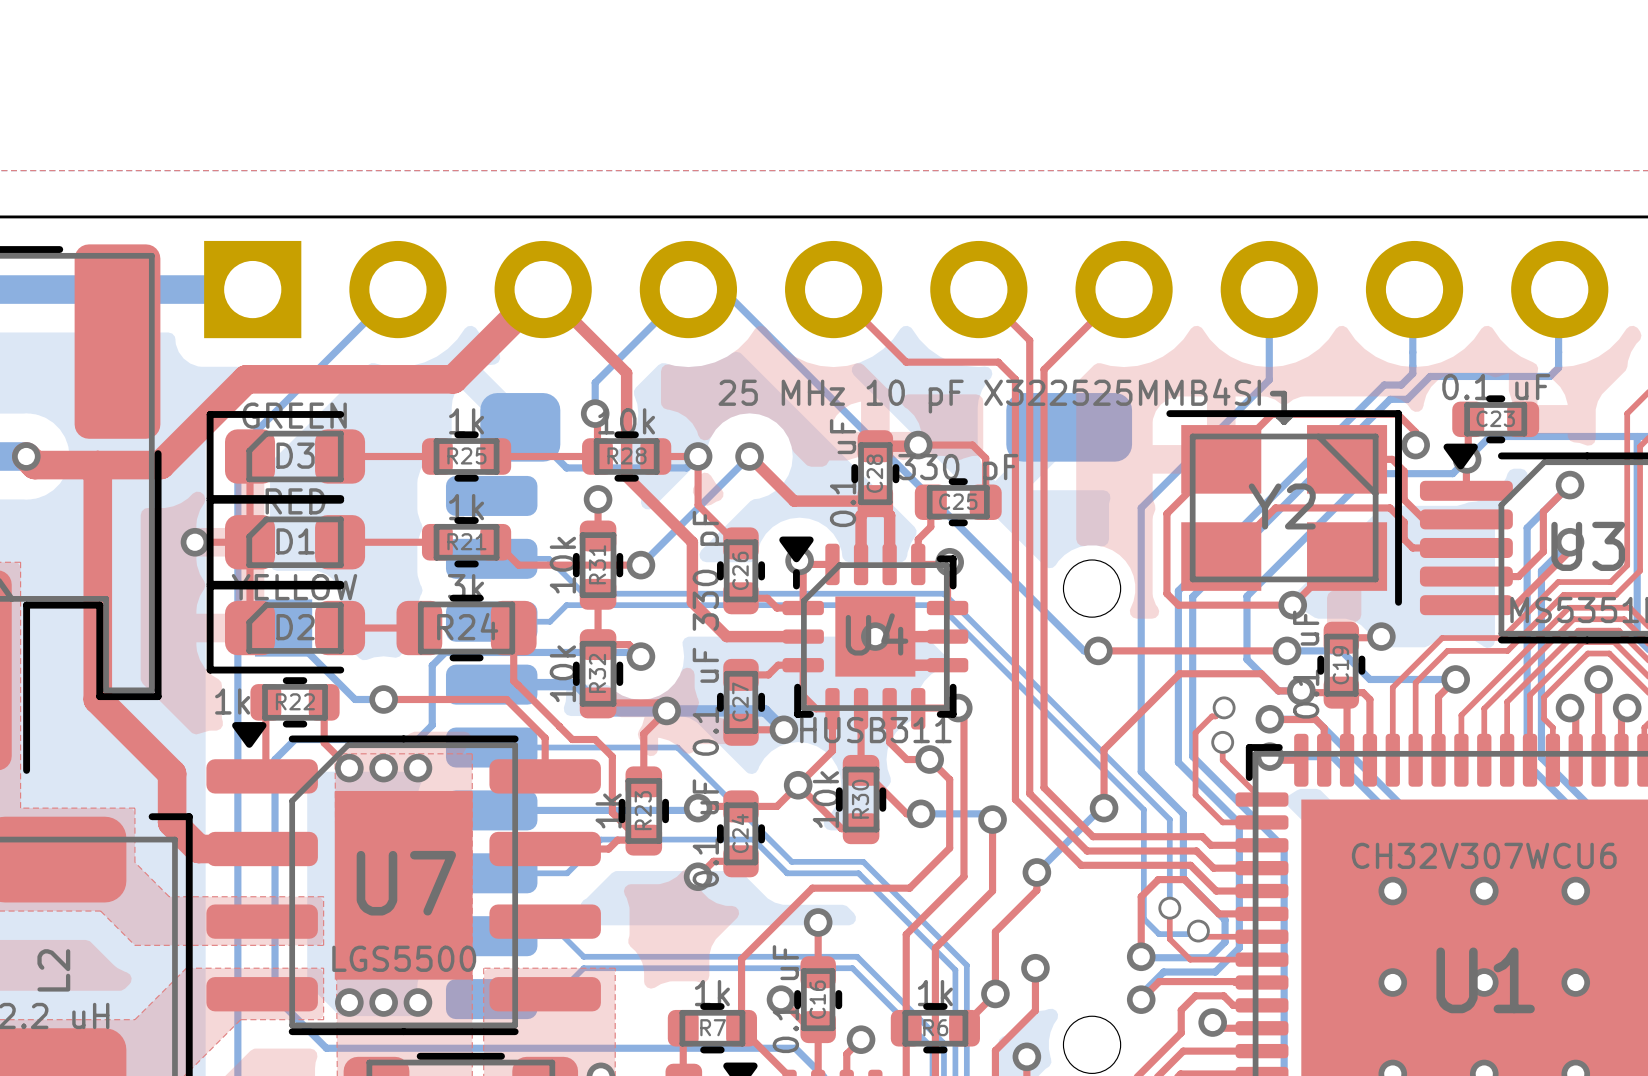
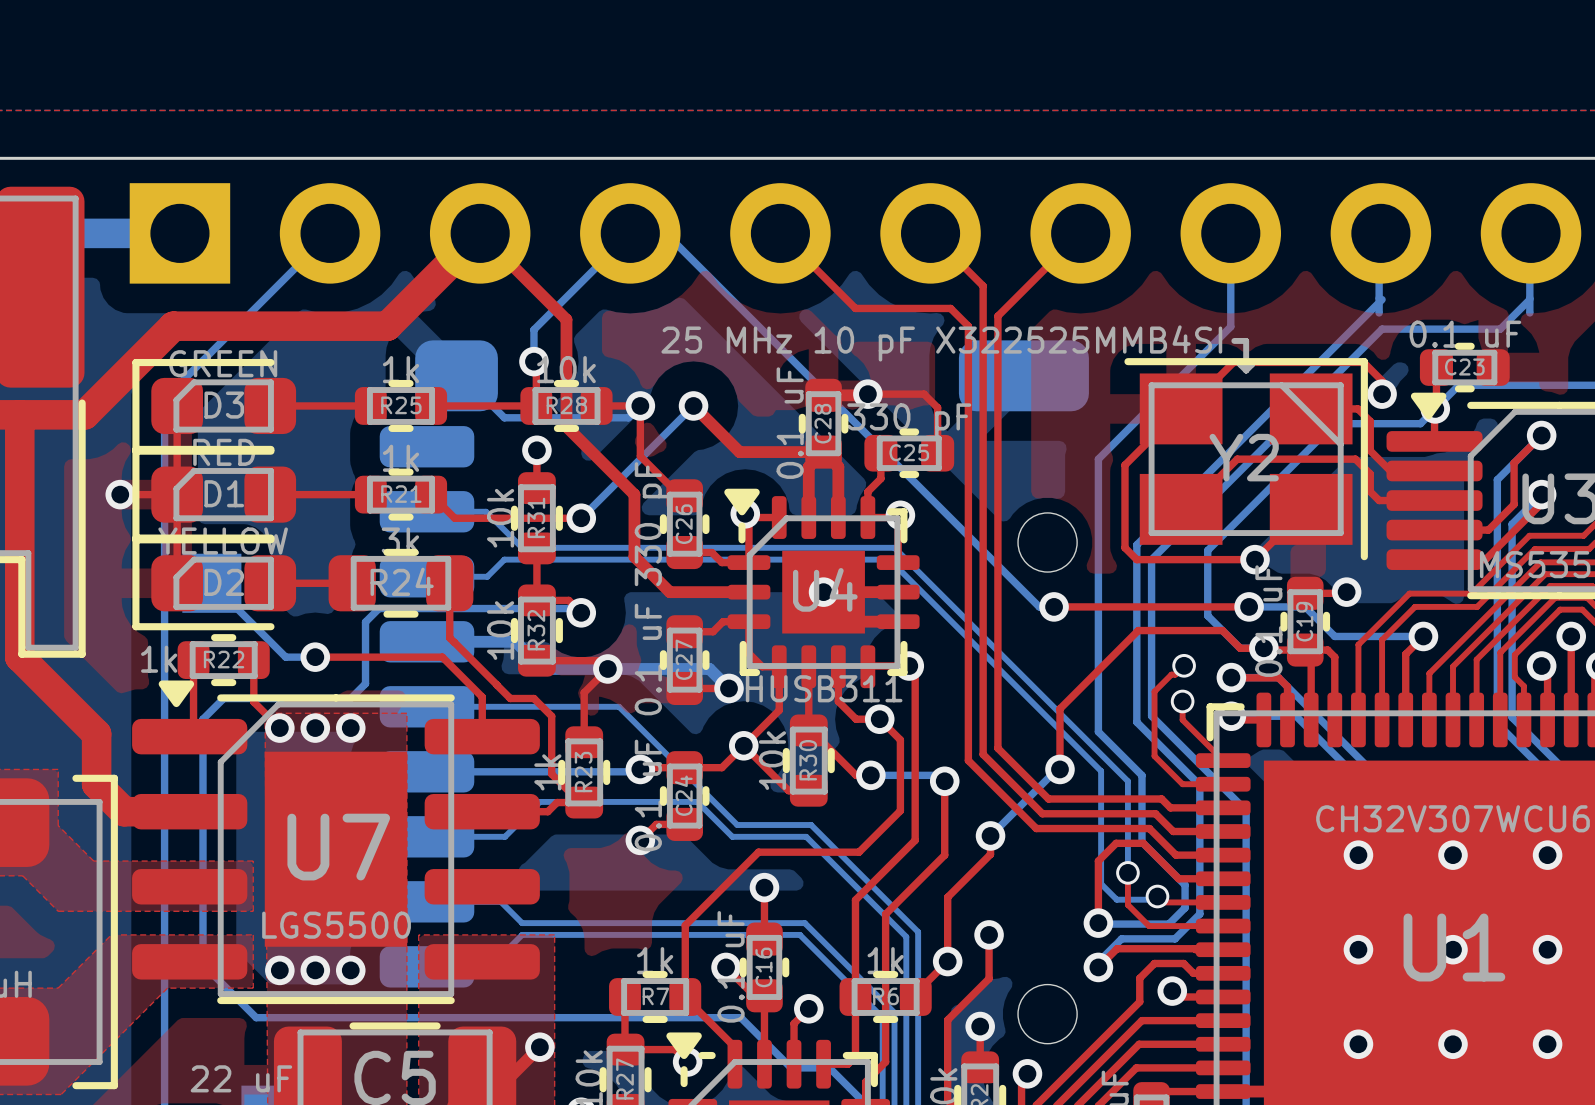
bottom track: (1412, 366) (1412, 373) (1401, 385) (1384, 385) -> (1382, 299) (1349, 332)
bottom track: (1558, 366) (1550, 376) (1430, 376) (1407, 399) (1390, 399) (1192, 596) (1192, 605) -> (1529, 299) (1500, 329) (1382, 329) (1151, 559)

